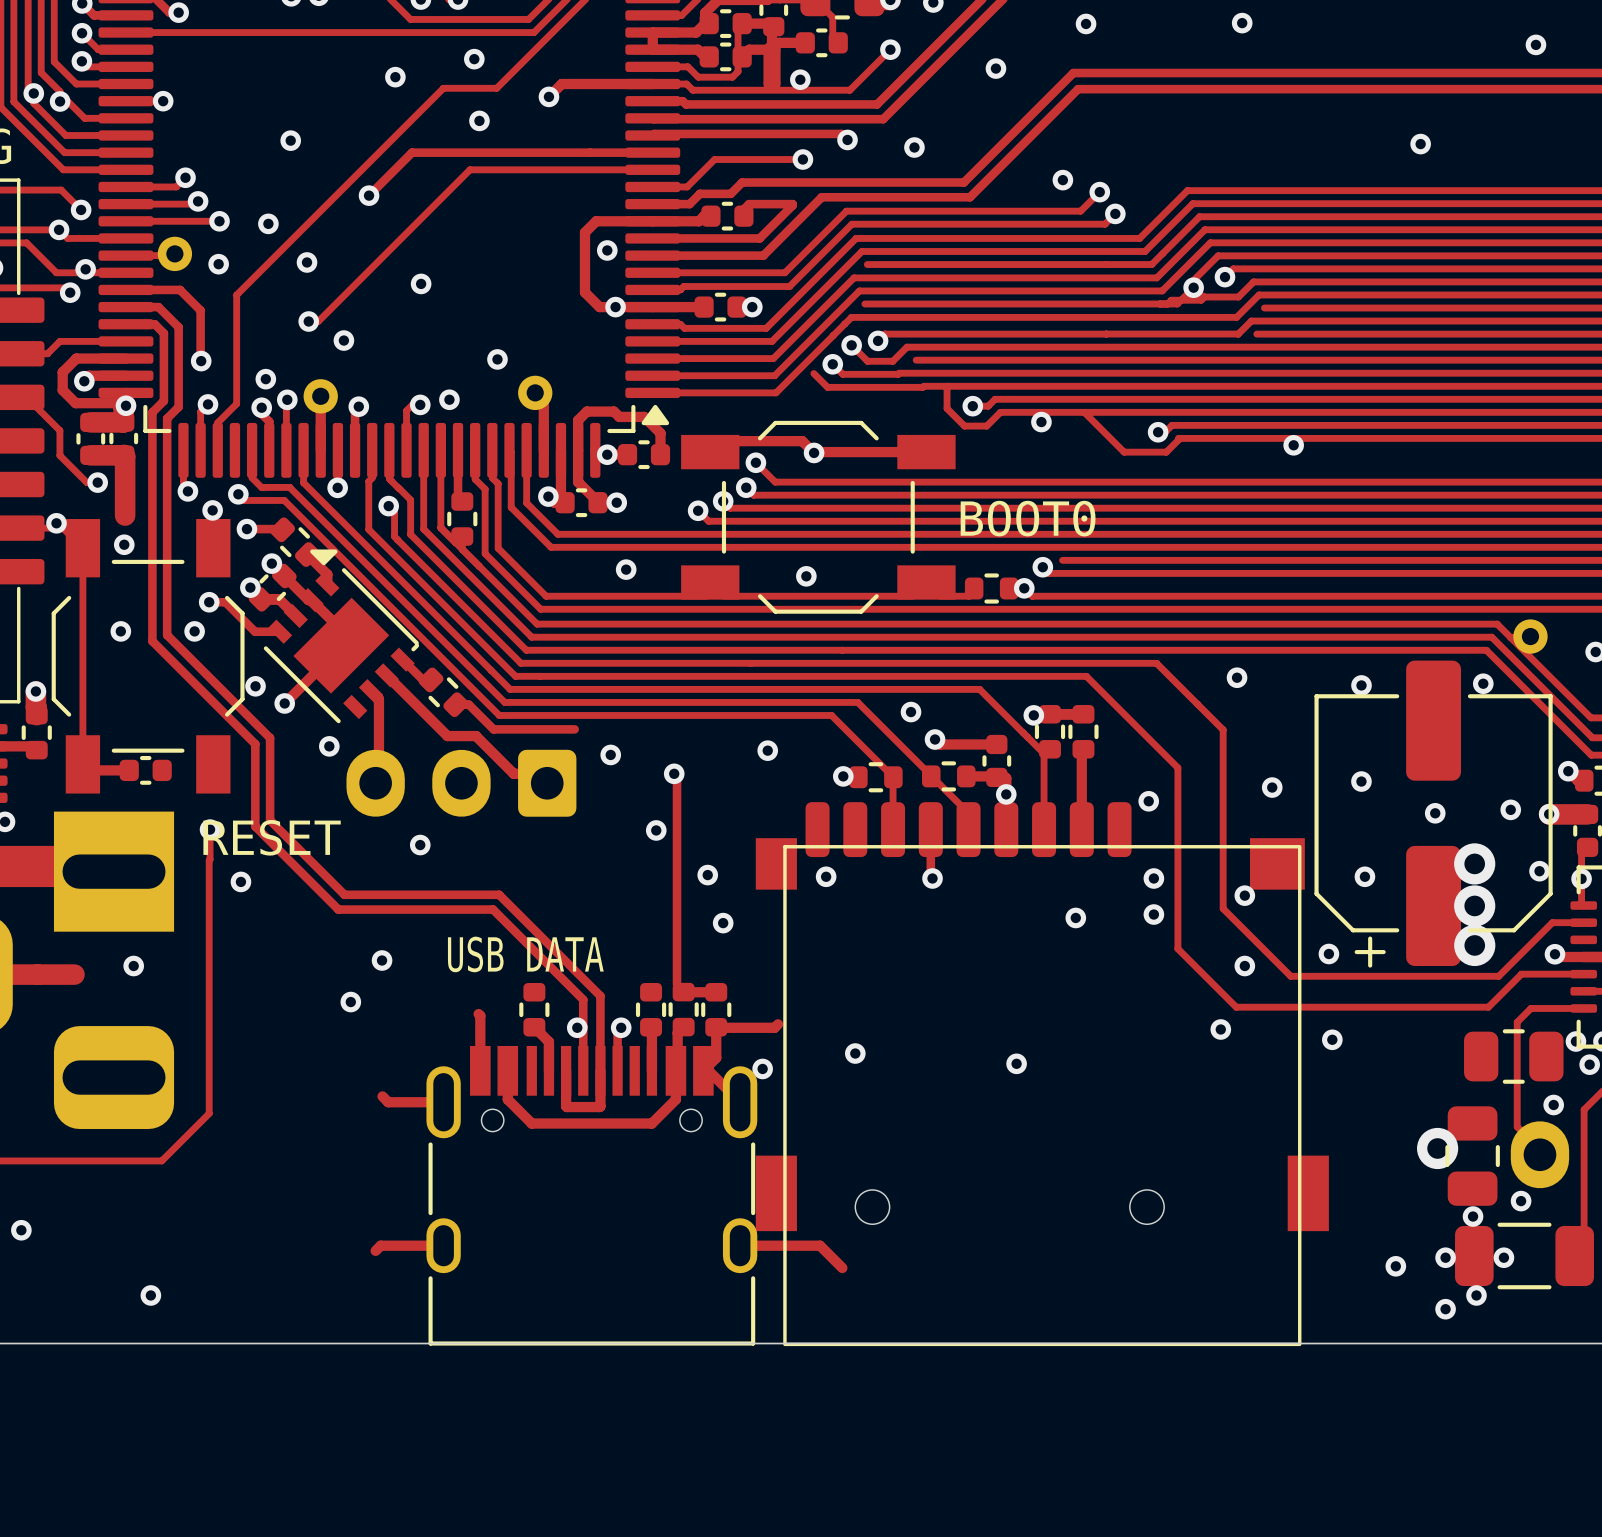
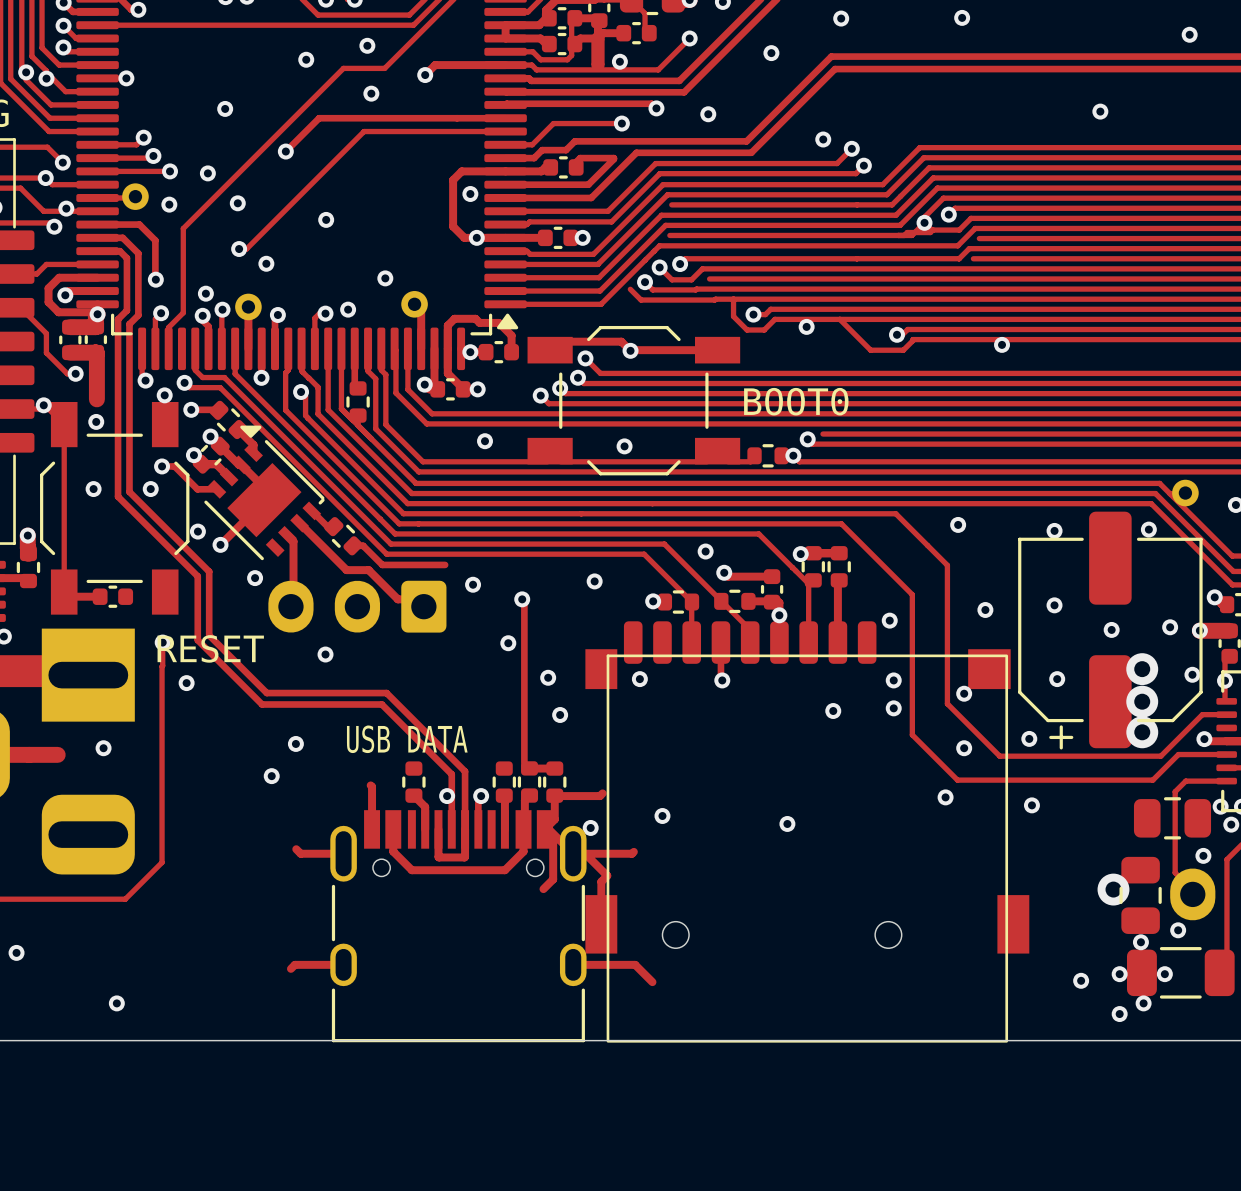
track: none -> (544, 829) (553, 837) (553, 879) (543, 889)
track: none -> (633, 851) (632, 853) (573, 853)
track: none -> (585, 853) (607, 875) (601, 881) (601, 924)

